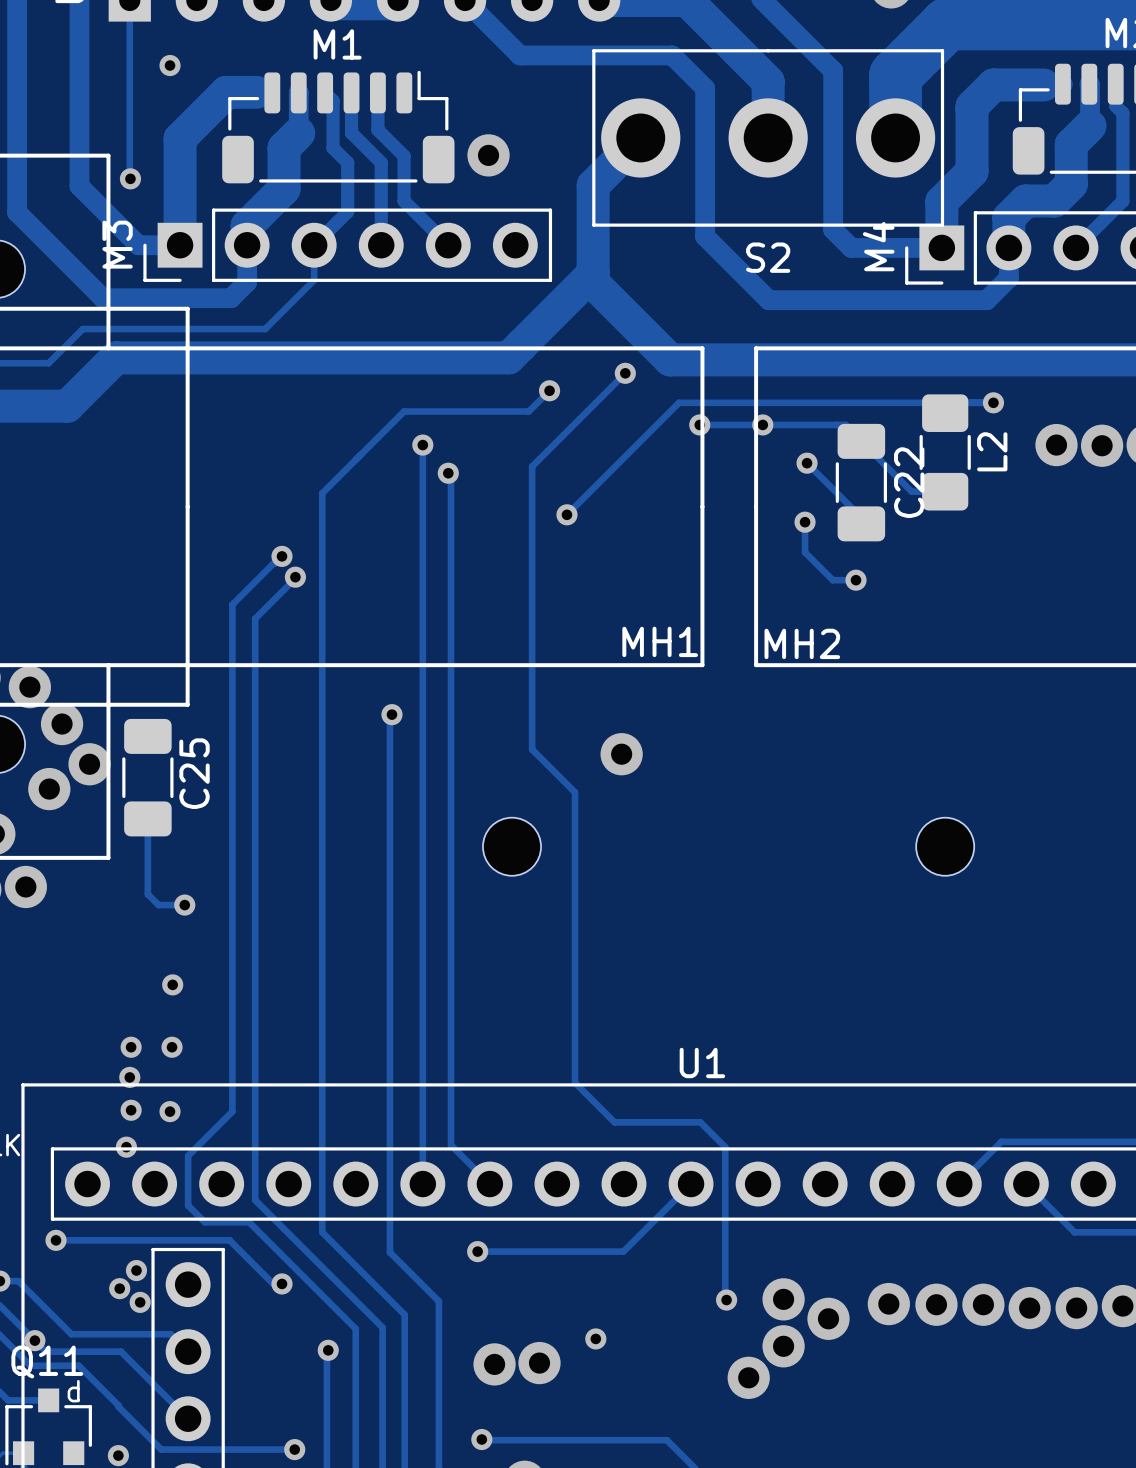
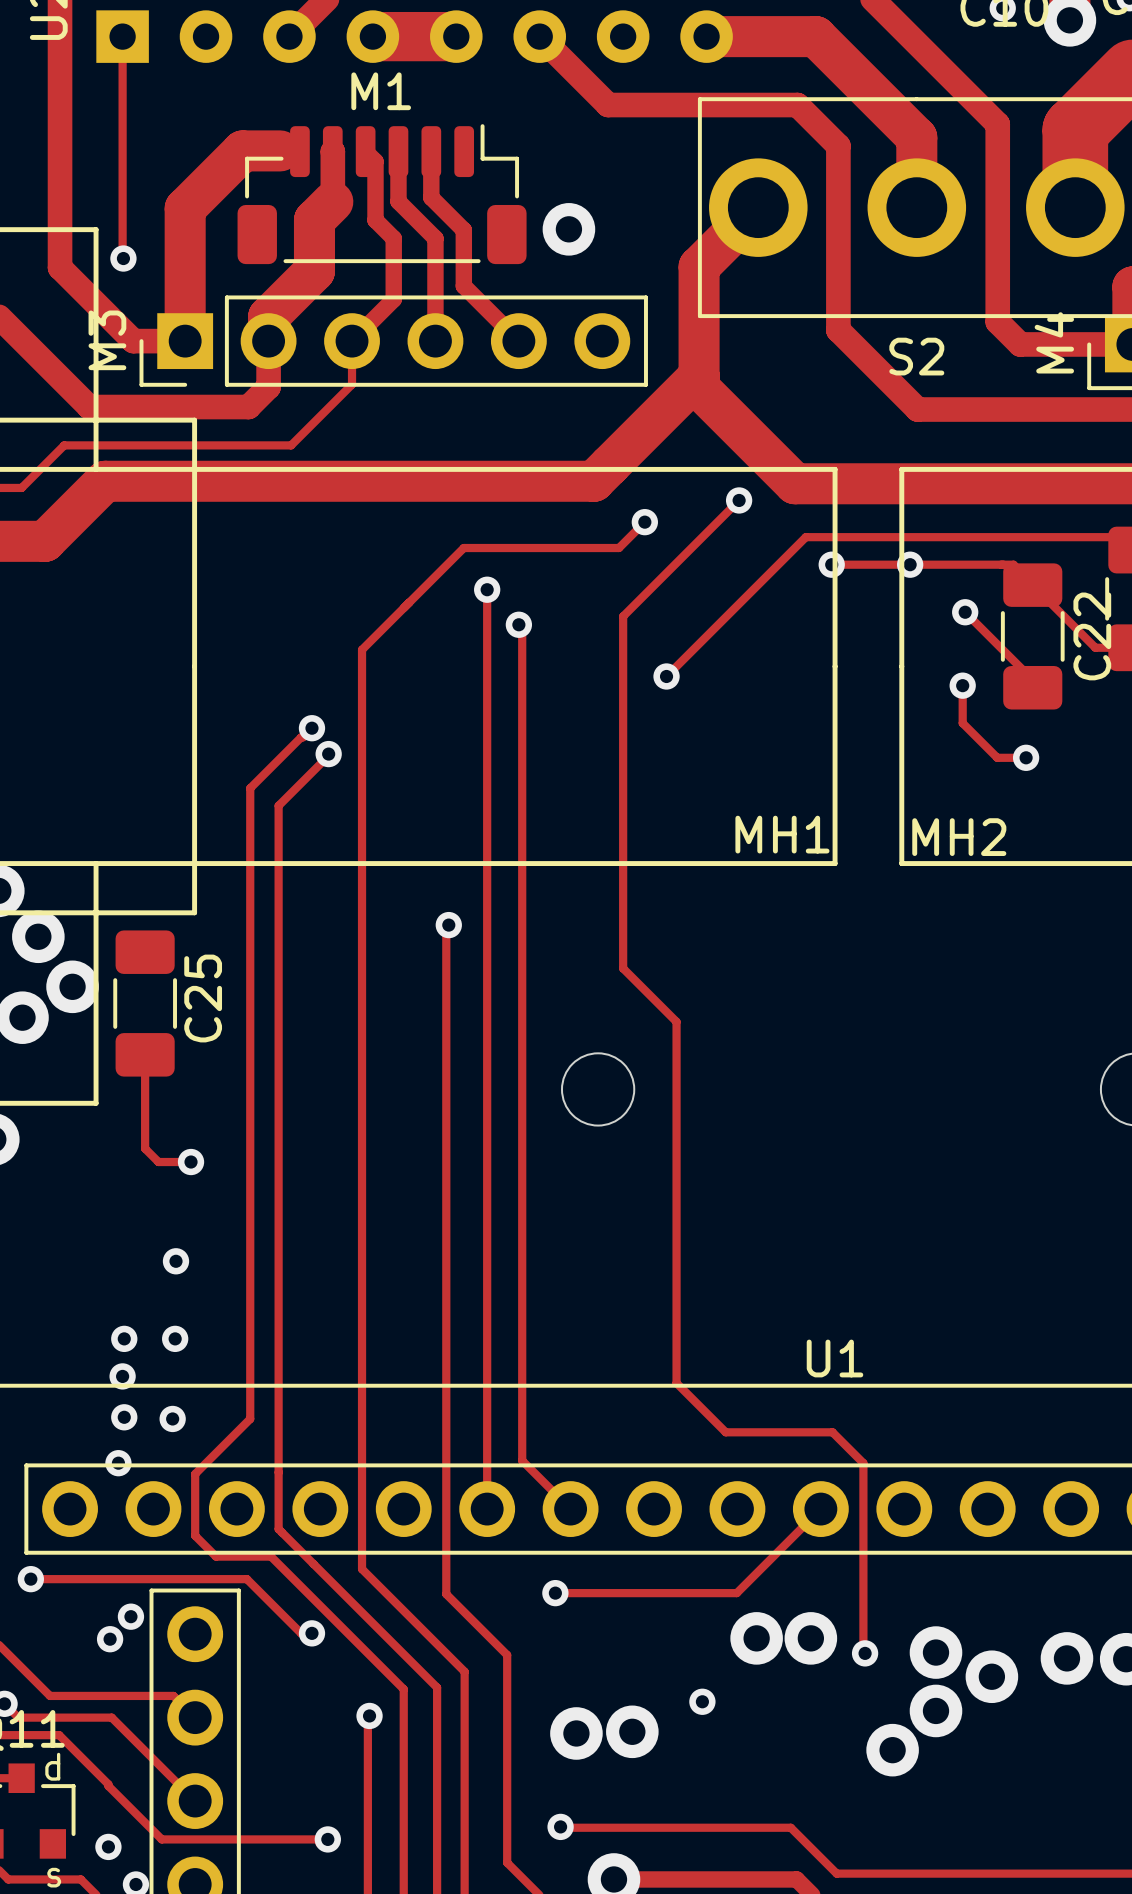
via: (170, 65) -> none
via: (621, 754) -> none
via: none -> (756, 1638)
via: none -> (810, 1638)
via: (140, 1302) -> none

